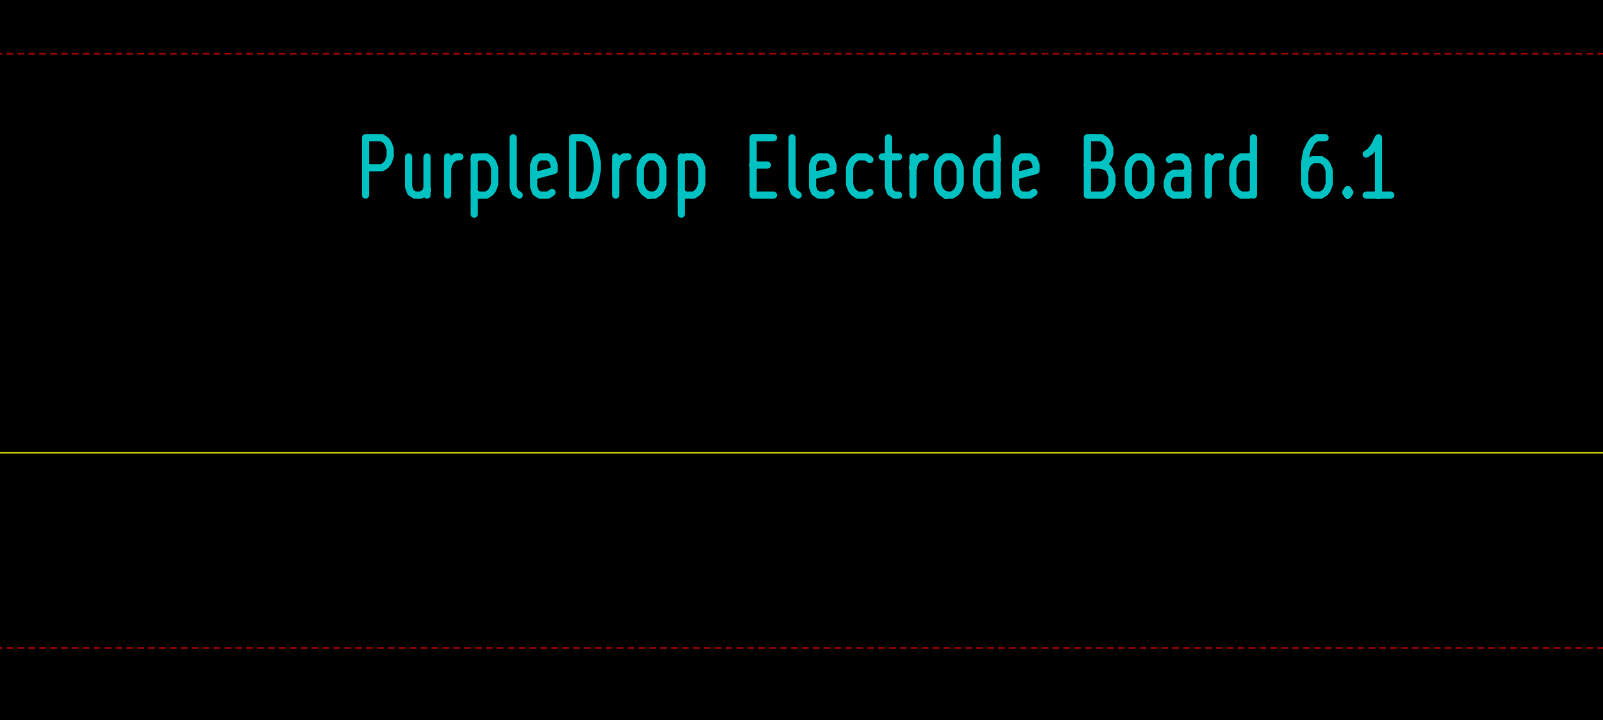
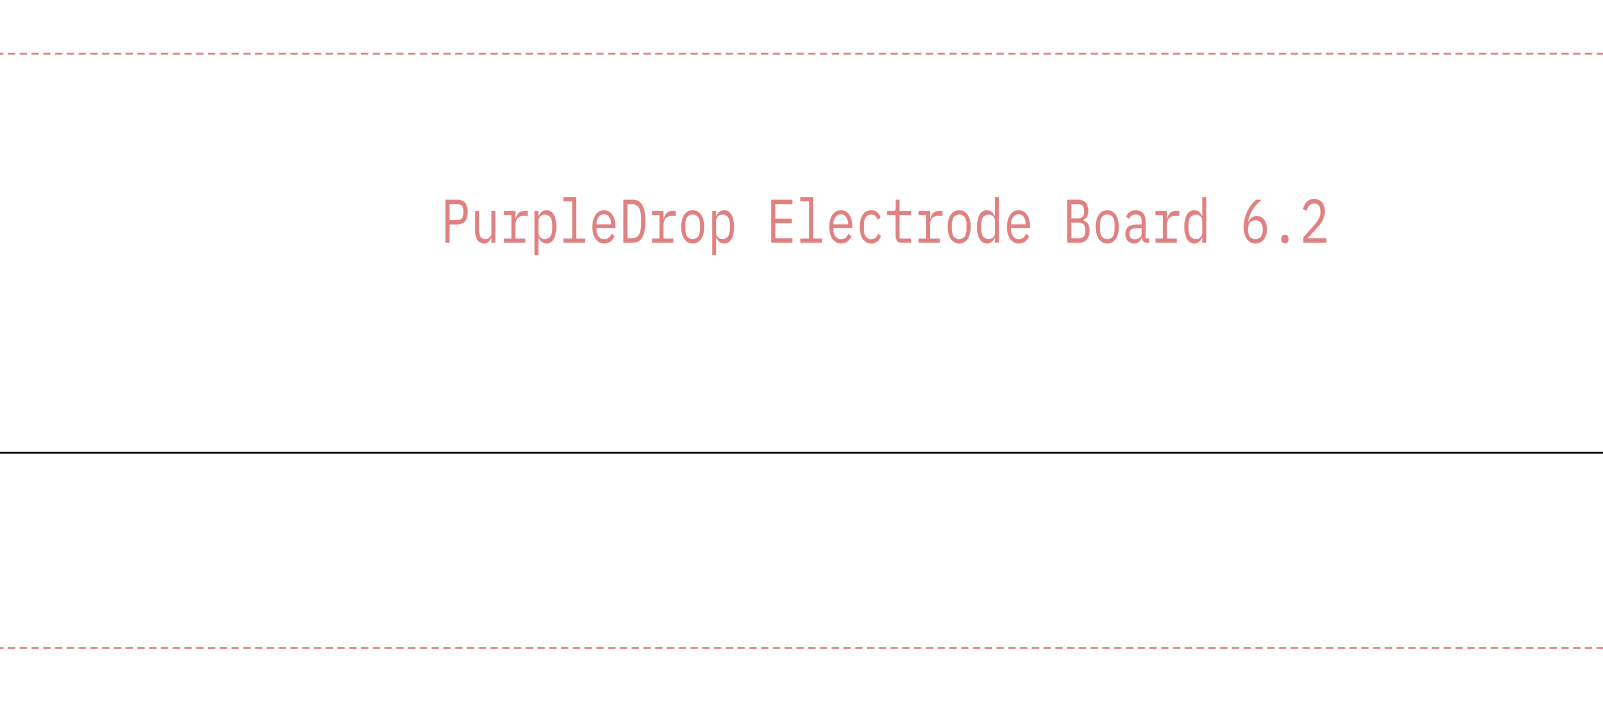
text: PurpleDrop Electrode Board 6.1 (878, 175) -> PurpleDrop Electrode Board 6.2 (885, 226)

